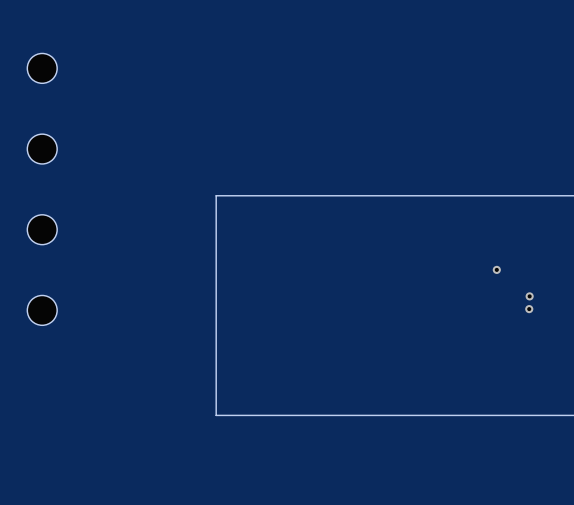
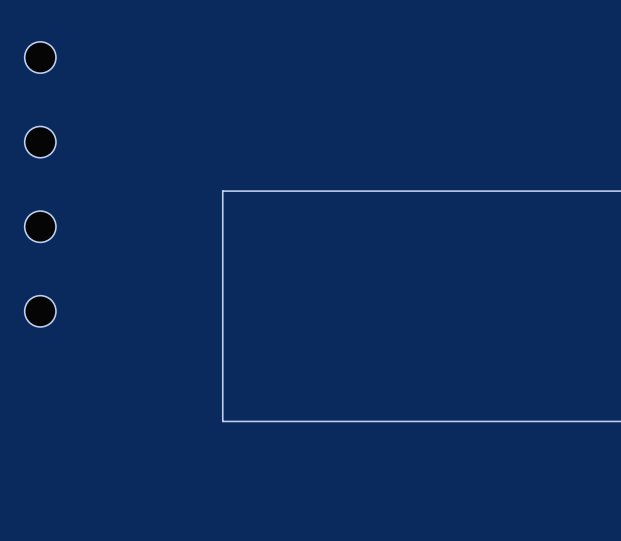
via: (496, 269) -> none
via: (529, 296) -> none
via: (529, 309) -> none

